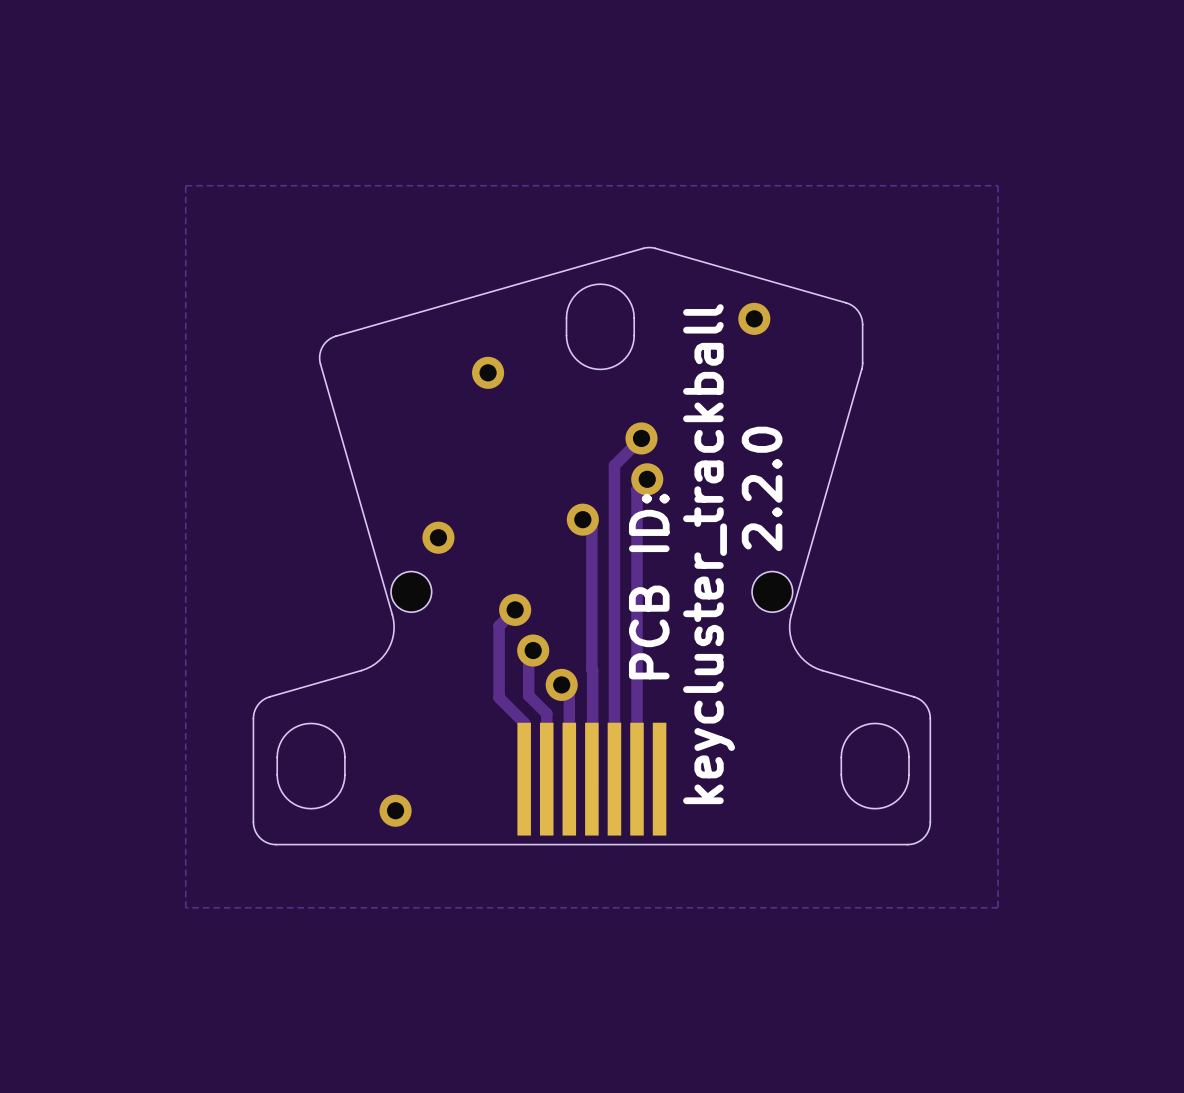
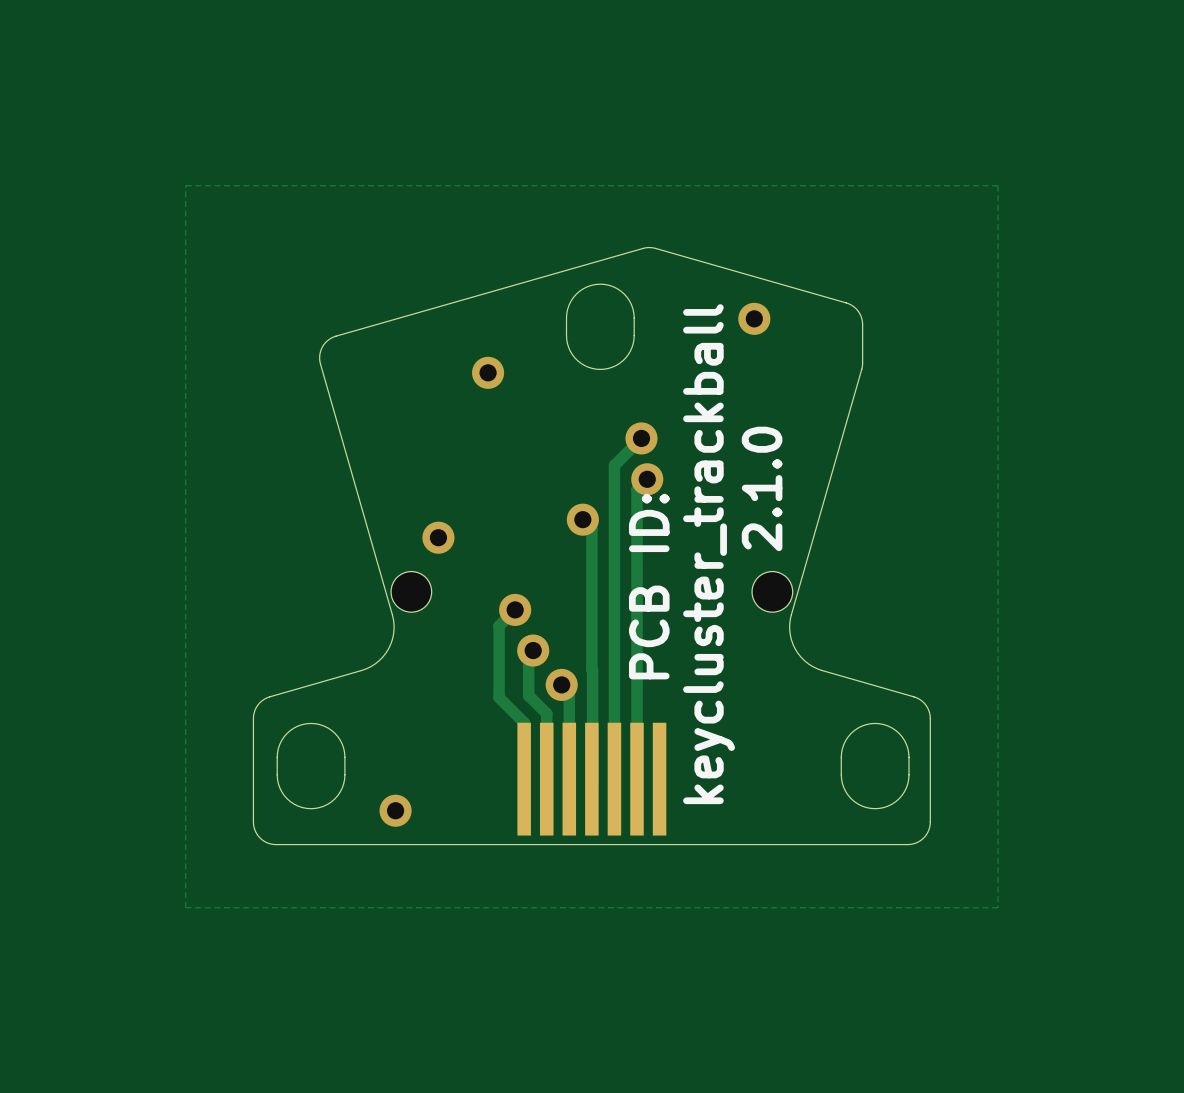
text: 2.2.0 (762, 488) -> 2.1.0 (762, 488)

